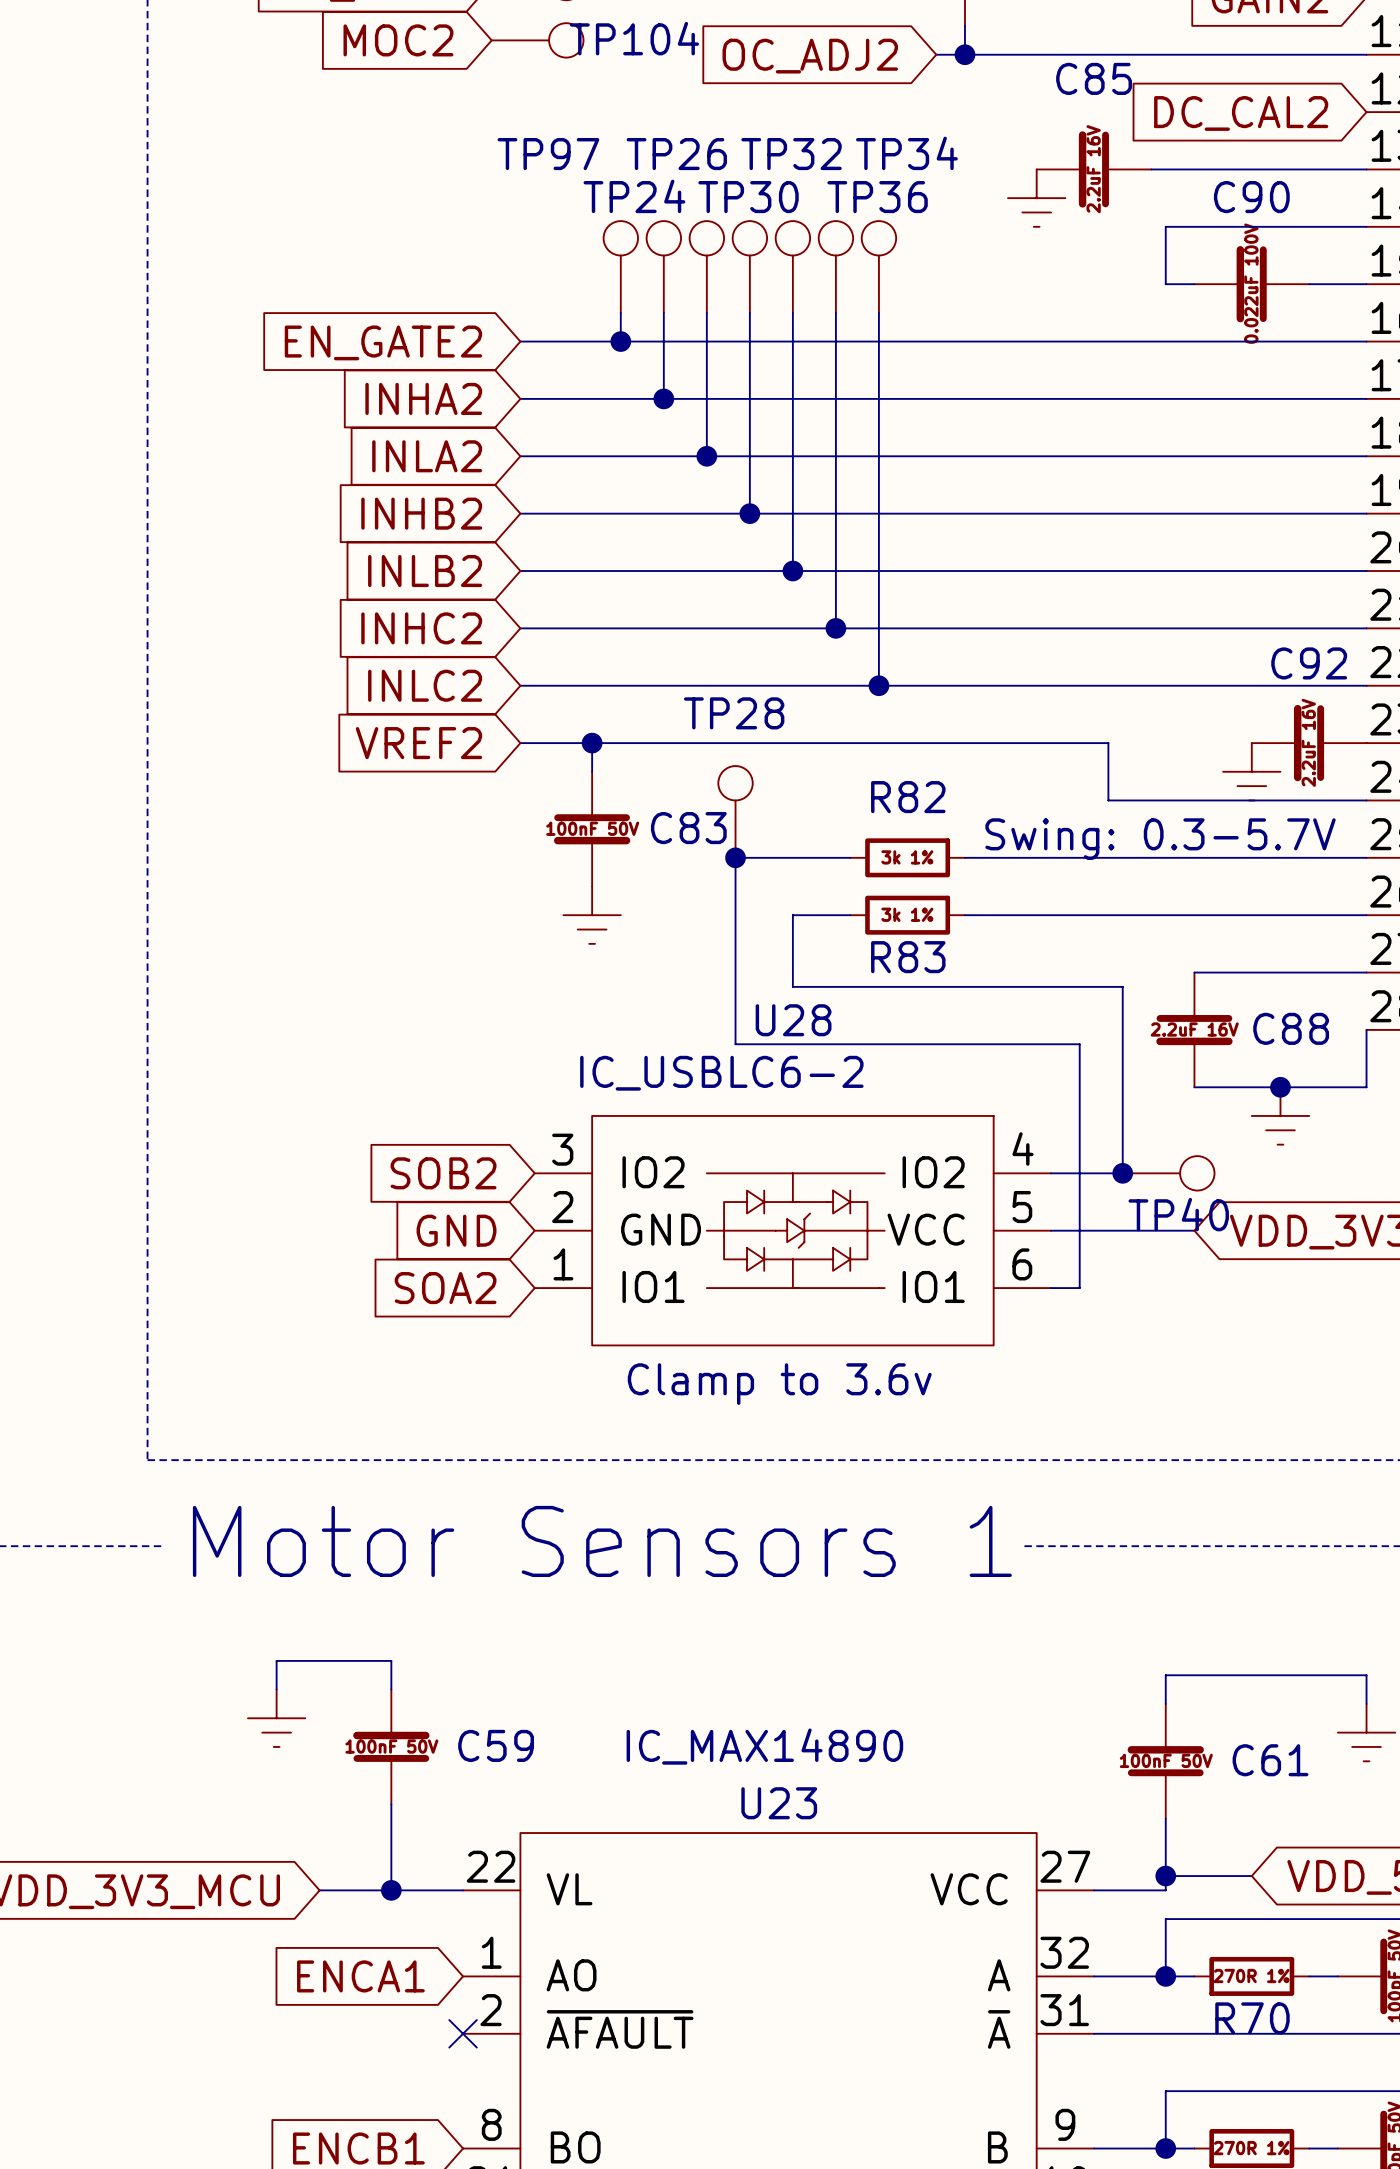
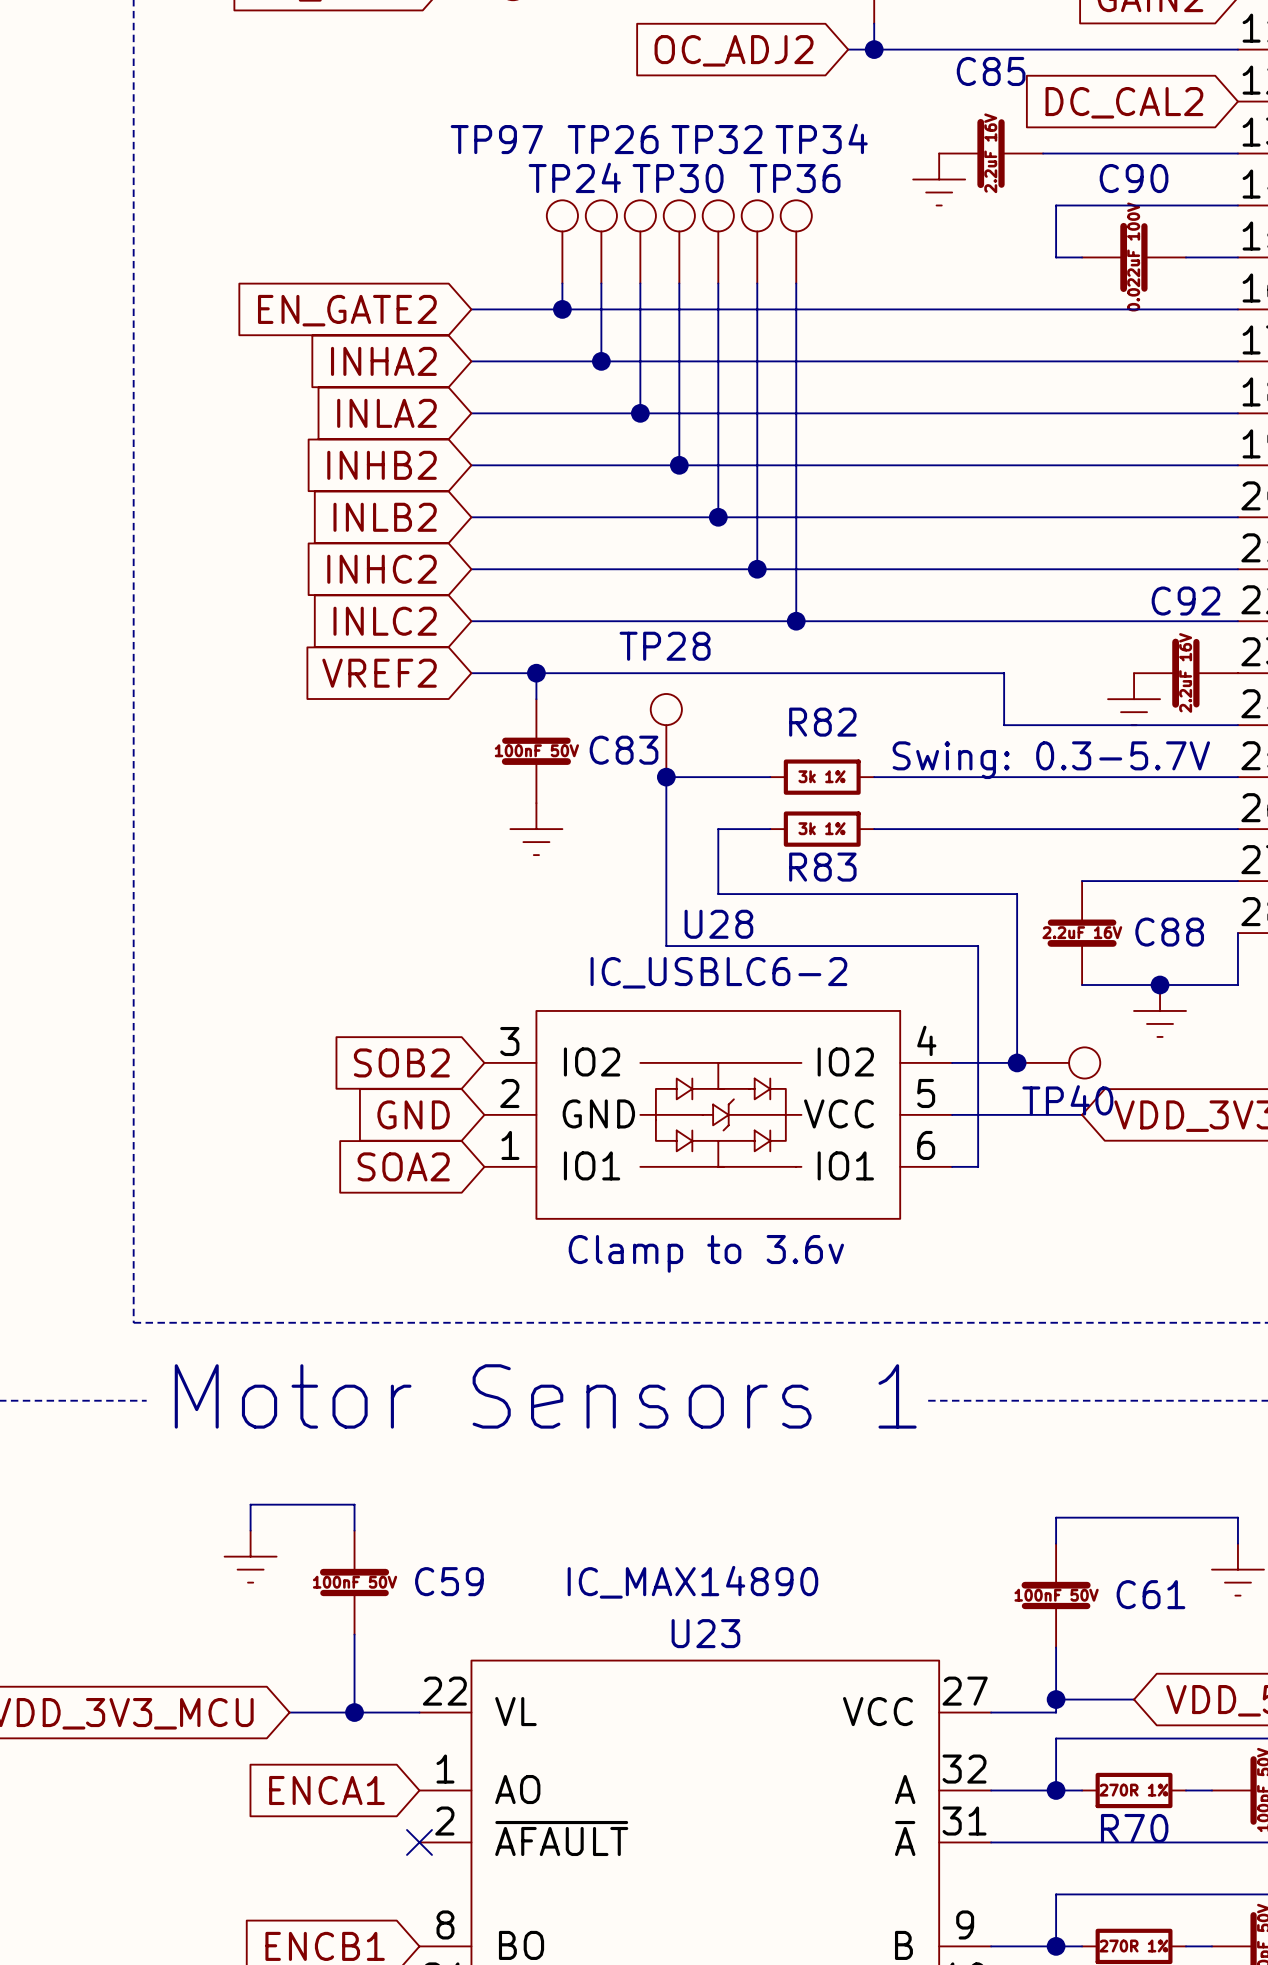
global label: MOC2 (398, 40) -> none
TP104: (537, 40) -> none
U28 value position: IC_USBLC6-2 (721, 1073) -> IC_USBLC6-2 (718, 972)

